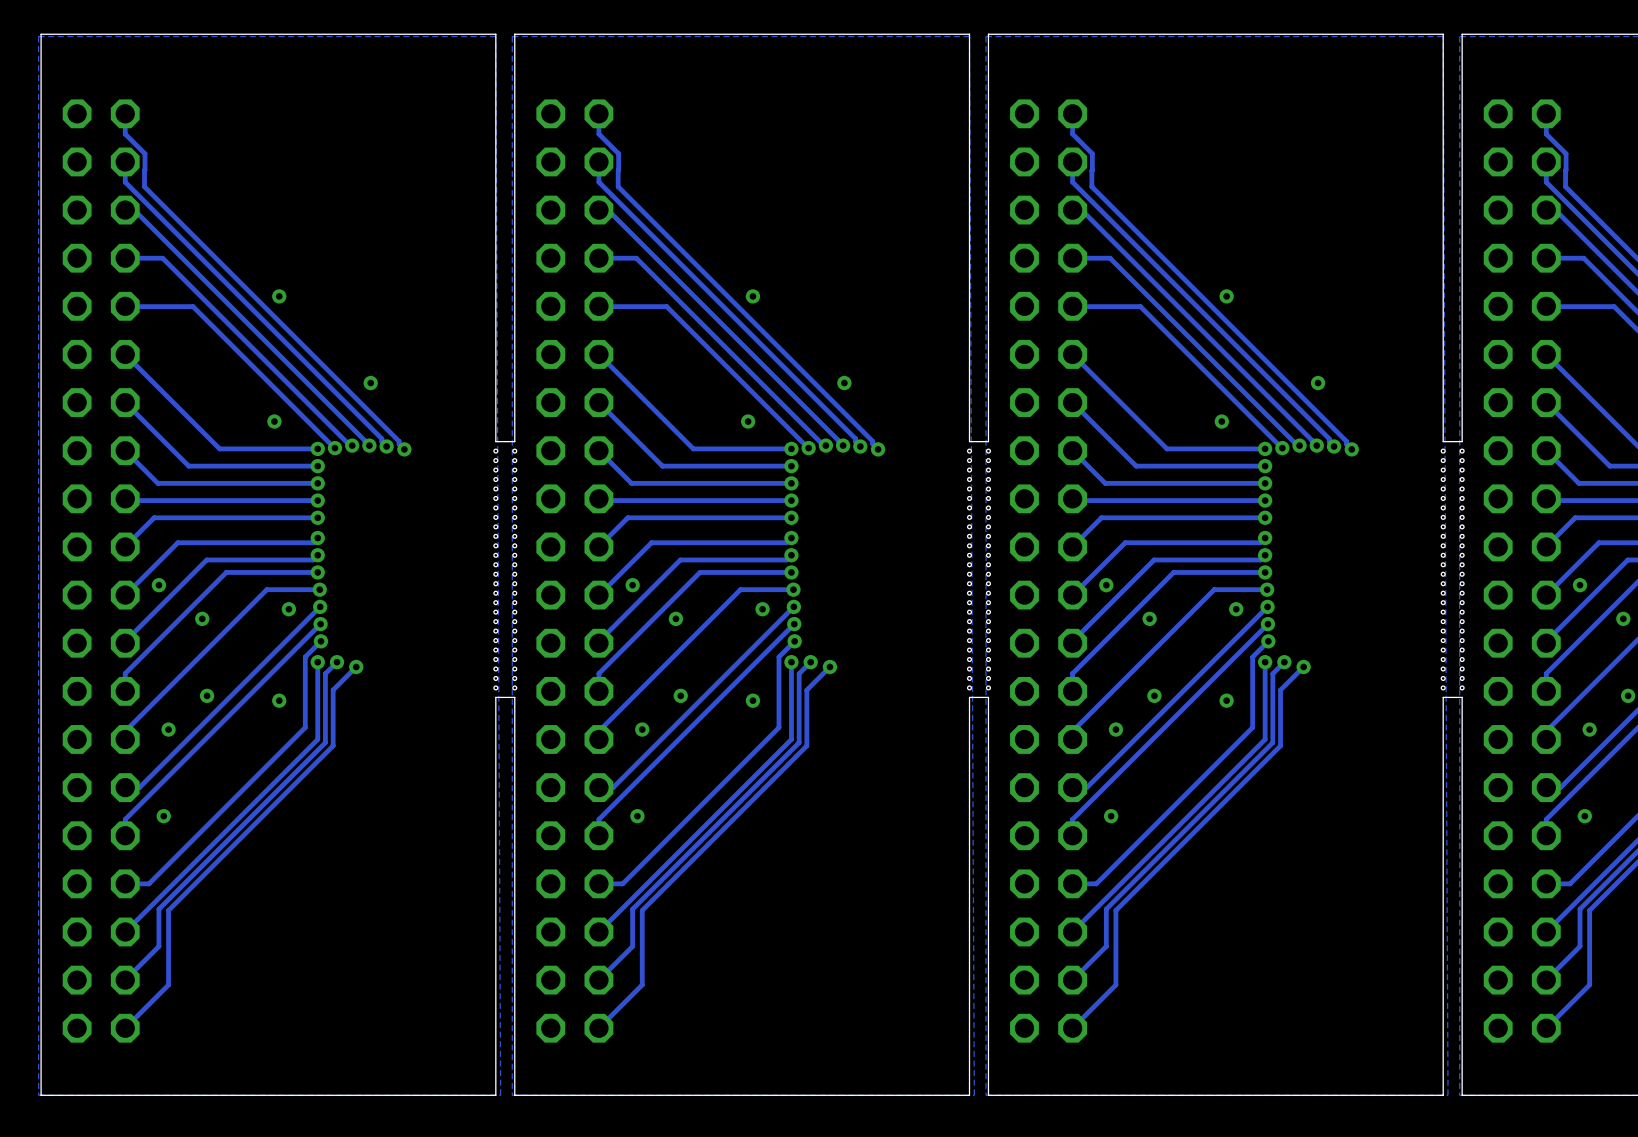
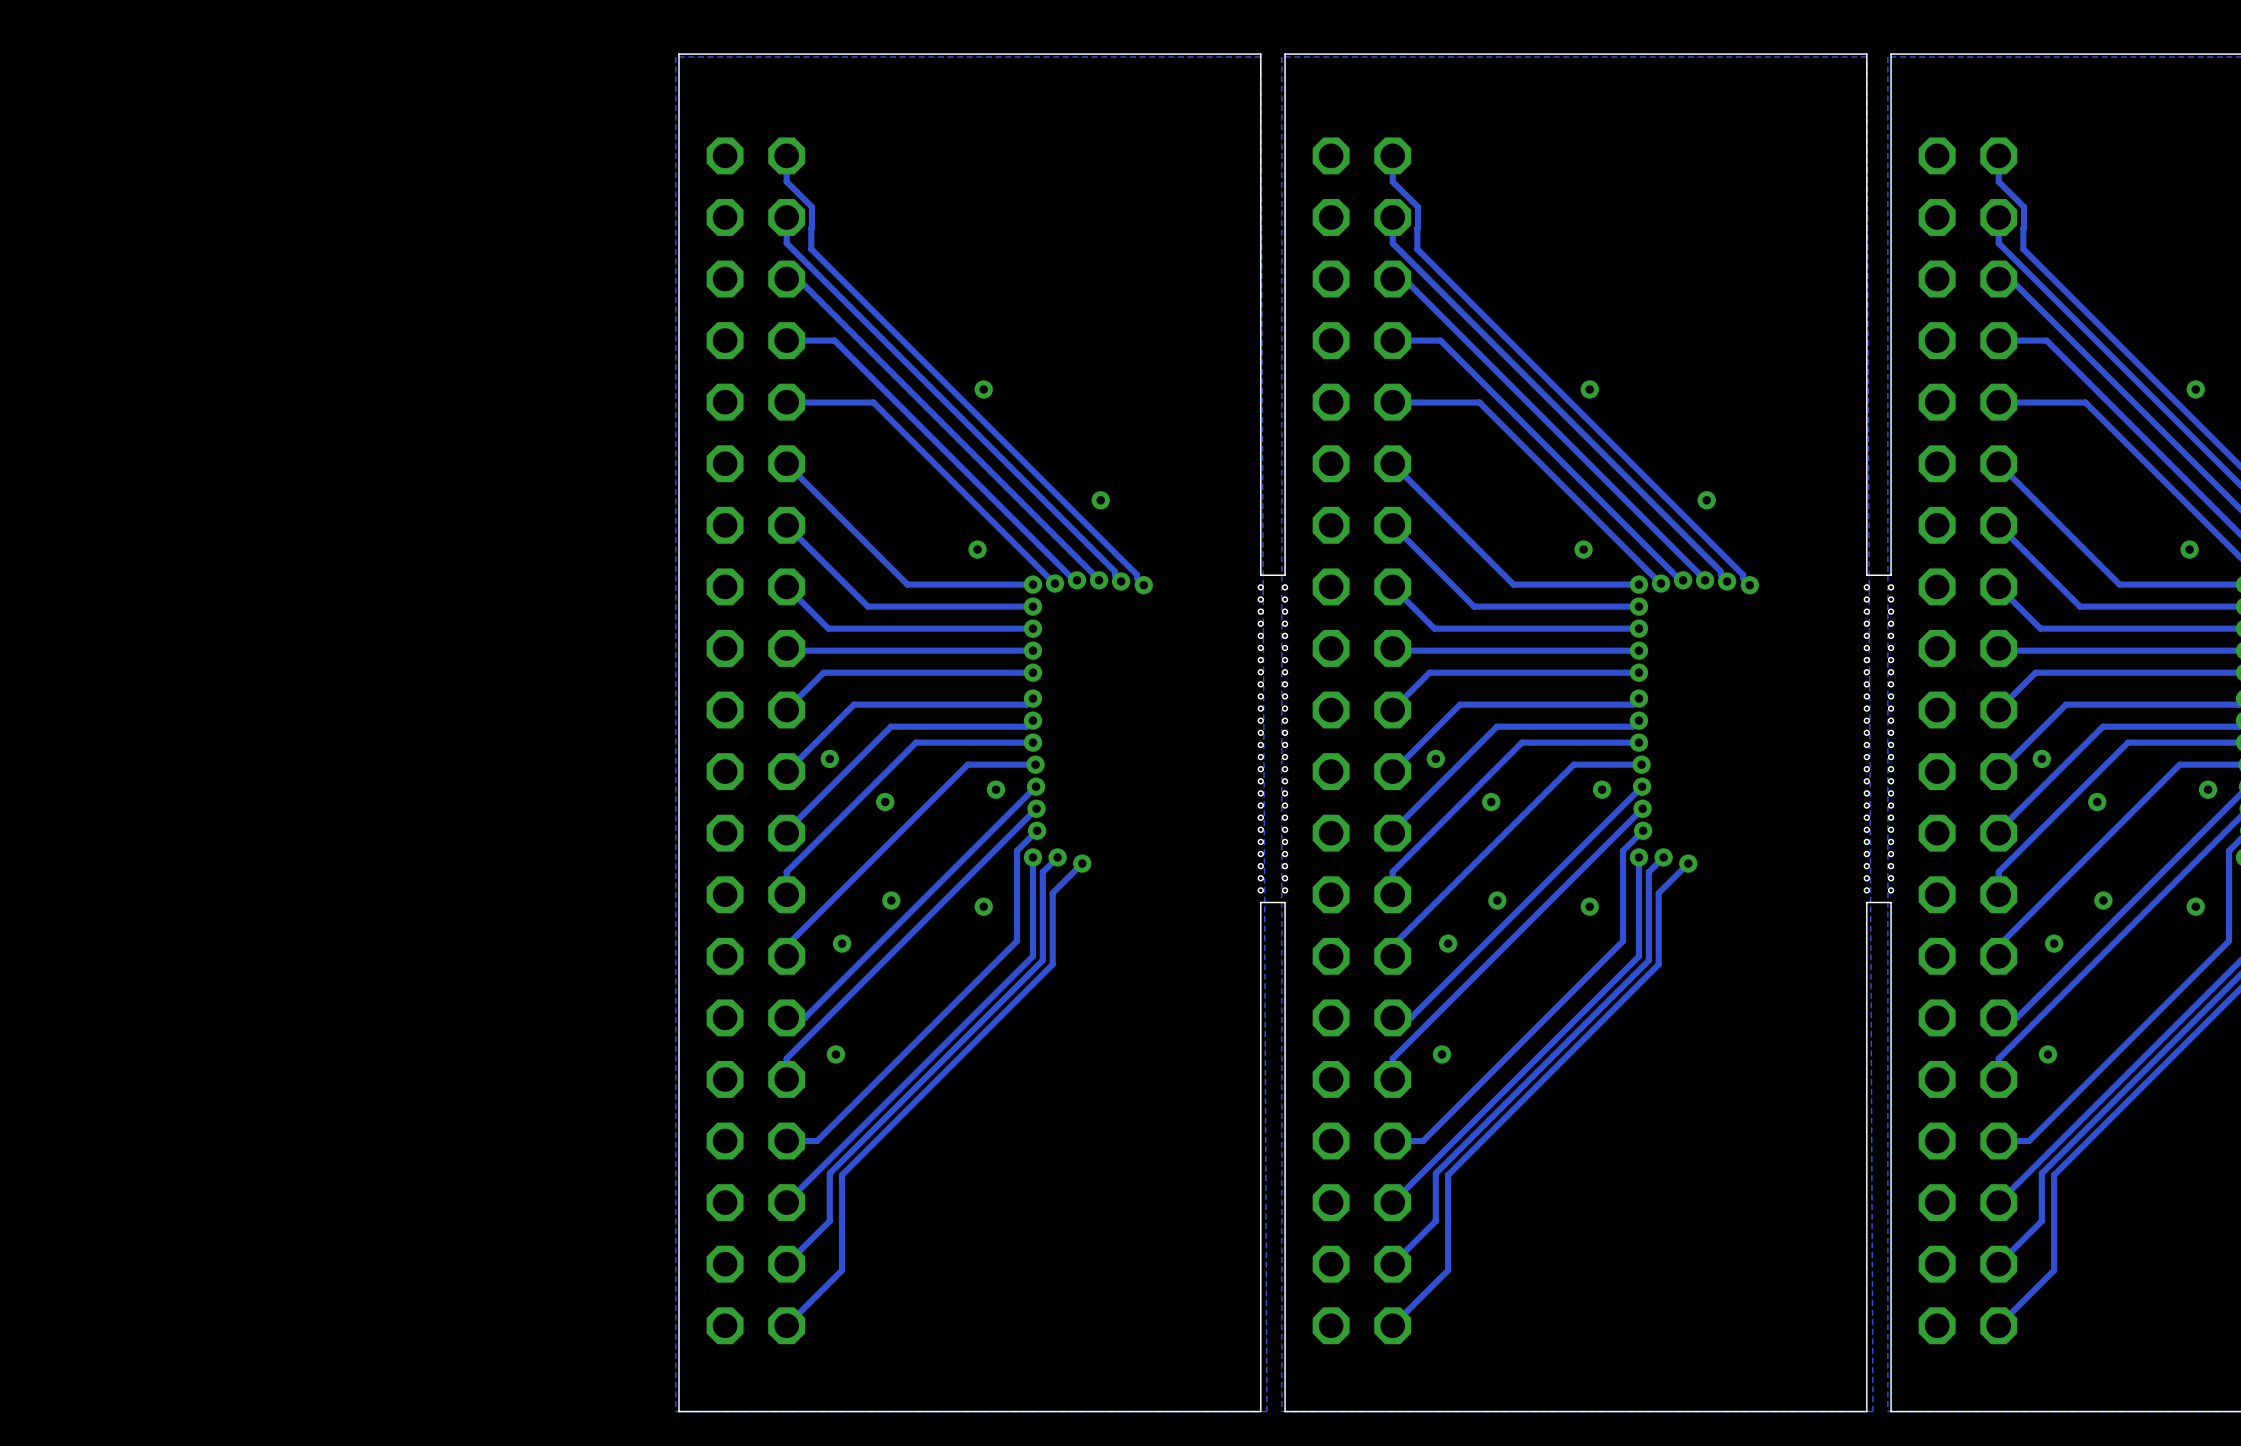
zone outline: (495, 36) (38, 36) (38, 1095) (500, 1095) (495, 36) -> none
track: (125, 113) (125, 134) (144, 153) (144, 186) (399, 441) (399, 444) (404, 449) -> none
track: (125, 161) (125, 182) (381, 438) (381, 441) (386, 446) -> none
track: (125, 210) (134, 210) (369, 445) -> none
track: (125, 258) (162, 258) (352, 445) -> none
via: (279, 296) -> none
track: (125, 306) (193, 306) (334, 448) -> none
track: (125, 354) (219, 448) (317, 448) -> none
via: (370, 383) -> none
track: (125, 402) (188, 466) (317, 466) -> none
via: (274, 421) -> none
board edge: (514, 441) (495, 441) (495, 34) (41, 34) (41, 1095) (495, 1095) (495, 697) (514, 697) -> (679, 575) (679, 902)
via: (352, 445) -> none
via: (369, 445) -> none
via: (386, 446) -> none
via: (317, 448) -> none
via: (334, 448) -> none
via: (404, 449) -> none
track: (125, 450) (157, 483) (317, 483) -> none
hole: (495, 451) -> none
hole: (514, 451) -> none
hole: (495, 460) -> none
hole: (514, 460) -> none
via: (317, 466) -> none
hole: (495, 470) -> none
hole: (514, 470) -> none
hole: (495, 479) -> none
hole: (514, 479) -> none
via: (317, 483) -> none
hole: (495, 488) -> none
hole: (514, 488) -> none
track: (125, 498) (126, 500) (317, 500) -> none
hole: (495, 498) -> none
hole: (514, 498) -> none
via: (317, 500) -> none
hole: (495, 507) -> none
hole: (514, 507) -> none
track: (317, 517) (154, 517) (125, 546) -> none
via: (317, 517) -> none
hole: (495, 517) -> none
hole: (514, 517) -> none
hole: (495, 526) -> none
hole: (514, 526) -> none
hole: (495, 536) -> none
hole: (514, 536) -> none
track: (317, 538) (312, 542) (177, 542) (125, 595) -> none
via: (317, 538) -> none
hole: (495, 545) -> none
hole: (514, 545) -> none
track: (317, 555) (312, 559) (206, 559) (125, 643) -> none
via: (317, 555) -> none
hole: (495, 555) -> none
hole: (514, 555) -> none
hole: (495, 564) -> none
hole: (514, 564) -> none
part: (101, 571) -> none
track: (317, 572) (226, 572) (125, 673) (125, 691) -> none
via: (317, 572) -> none
hole: (495, 574) -> none
hole: (514, 574) -> none
hole: (495, 583) -> none
hole: (514, 583) -> none
via: (158, 585) -> none
track: (319, 589) (266, 589) (125, 731) (125, 739) -> none
via: (319, 589) -> none
hole: (495, 593) -> none
hole: (514, 593) -> none
hole: (495, 602) -> none
hole: (514, 602) -> none
track: (320, 606) (139, 787) (125, 787) -> none
via: (320, 606) -> none
via: (288, 609) -> none
hole: (495, 612) -> none
hole: (514, 612) -> none
via: (202, 618) -> none
hole: (495, 621) -> none
hole: (514, 621) -> none
track: (320, 624) (125, 819) (125, 835) -> none
via: (320, 624) -> none
hole: (495, 631) -> none
hole: (514, 631) -> none
hole: (495, 640) -> none
hole: (514, 640) -> none
track: (320, 641) (305, 657) (305, 727) (149, 883) (125, 883) -> none
via: (320, 641) -> none
hole: (495, 650) -> none
hole: (514, 650) -> none
hole: (495, 659) -> none
hole: (514, 659) -> none
track: (317, 662) (317, 739) (125, 931) -> none
via: (317, 662) -> none
track: (337, 662) (325, 673) (325, 742) (158, 909) (158, 946) (125, 980) -> none
via: (337, 662) -> none
track: (356, 666) (333, 690) (333, 745) (168, 910) (168, 984) (125, 1028) -> none
via: (356, 666) -> none
hole: (495, 668) -> none
hole: (514, 668) -> none
hole: (495, 678) -> none
hole: (514, 678) -> none
hole: (495, 687) -> none
hole: (514, 687) -> none
via: (207, 695) -> none
via: (279, 700) -> none
via: (168, 729) -> none
via: (163, 816) -> none

